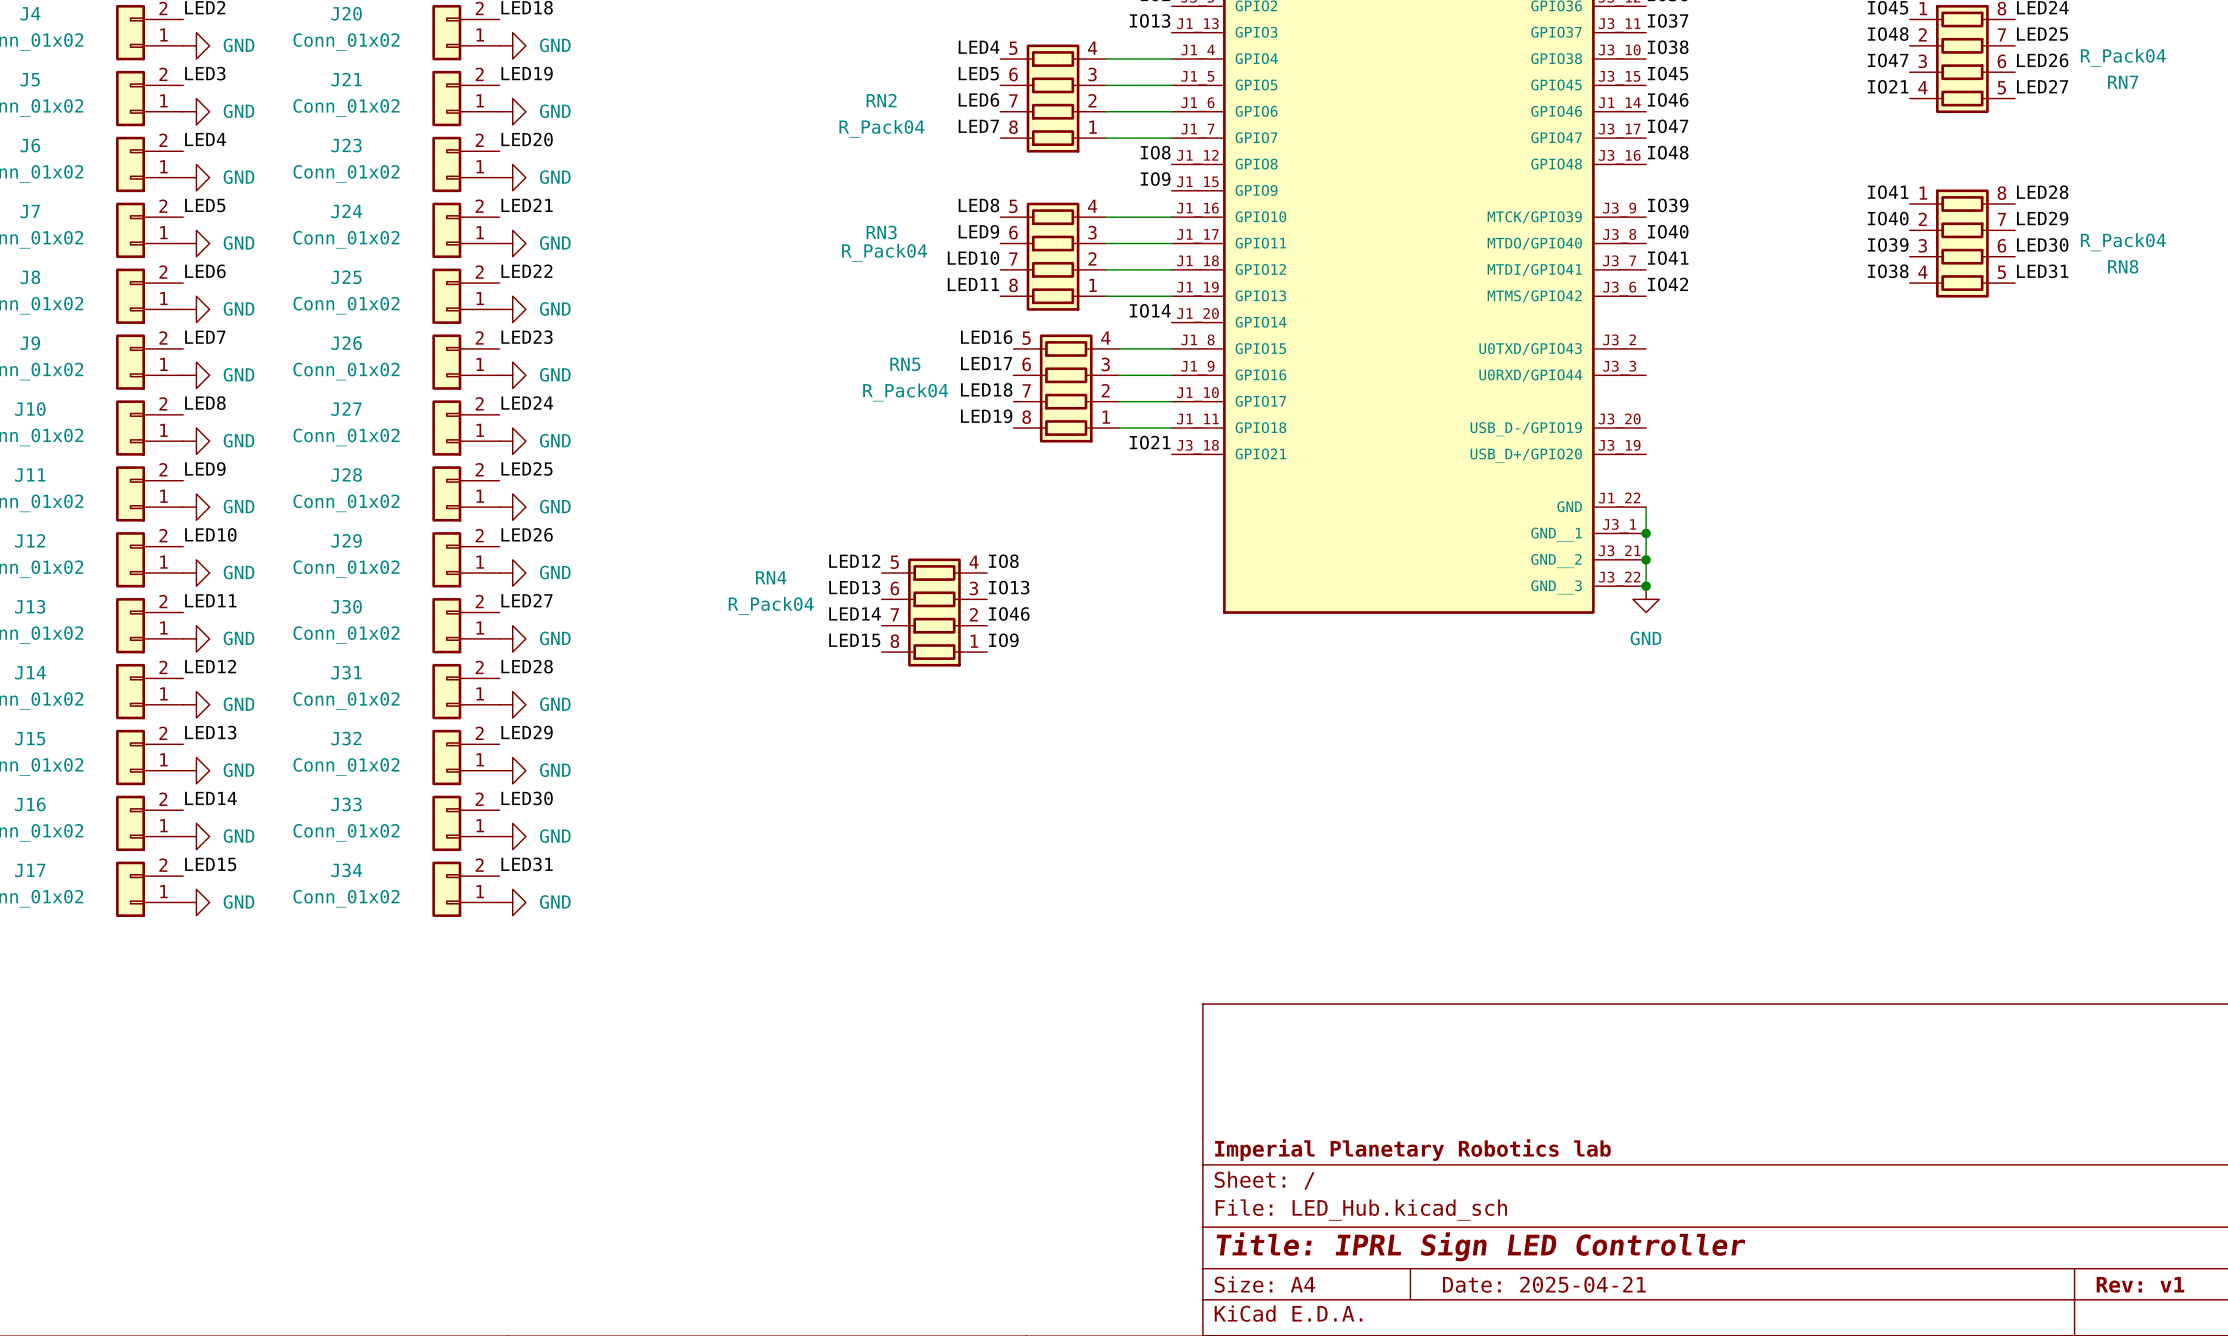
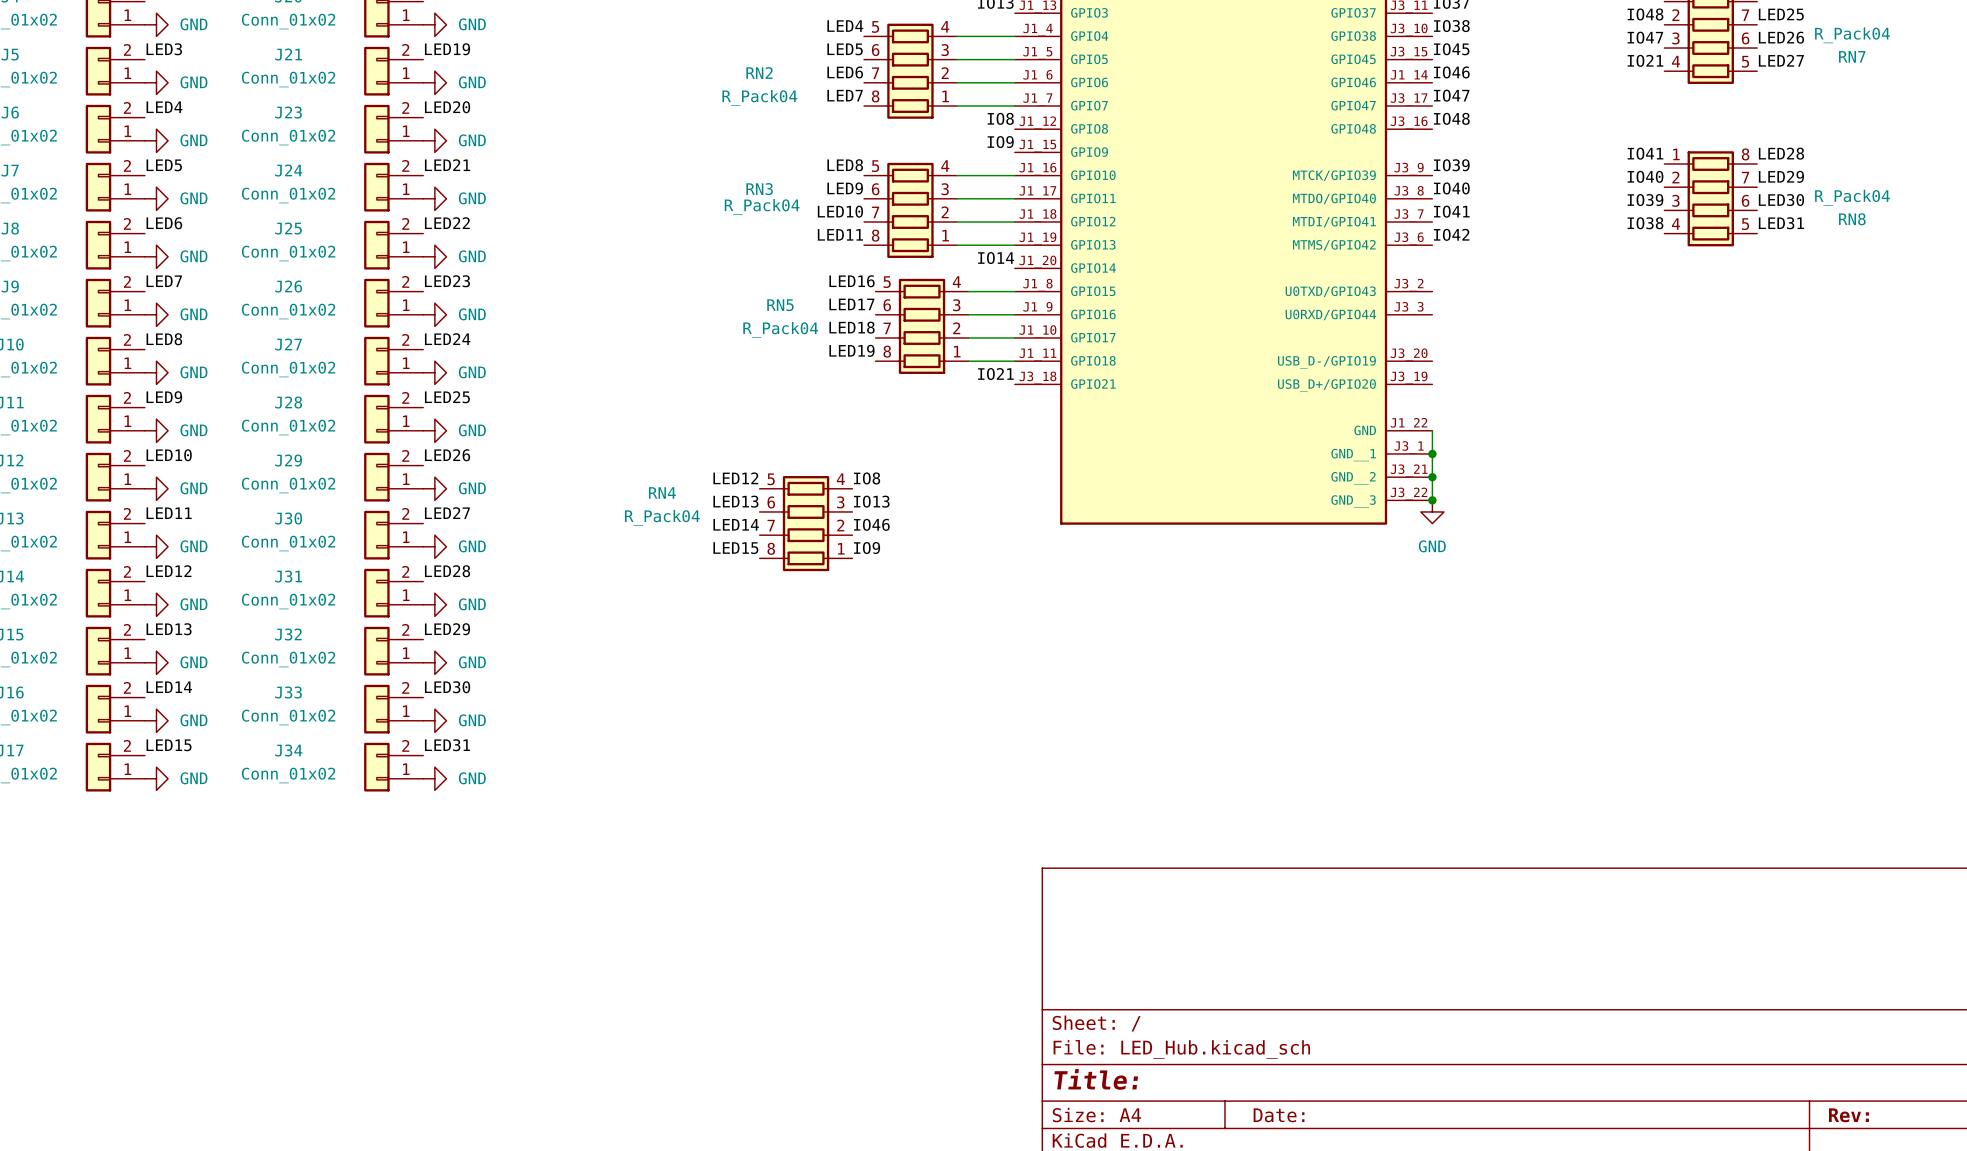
title block: Imperial Planetary Robotics lab (1412, 1150) -> none
title block: Title: IPRL Sign LED Controller (1480, 1246) -> Title: (1096, 1079)
title block: Date: 2025-04-21 (1544, 1284) -> Date: (1279, 1115)
title block: Rev: v1 (2140, 1284) -> Rev: (1848, 1115)

